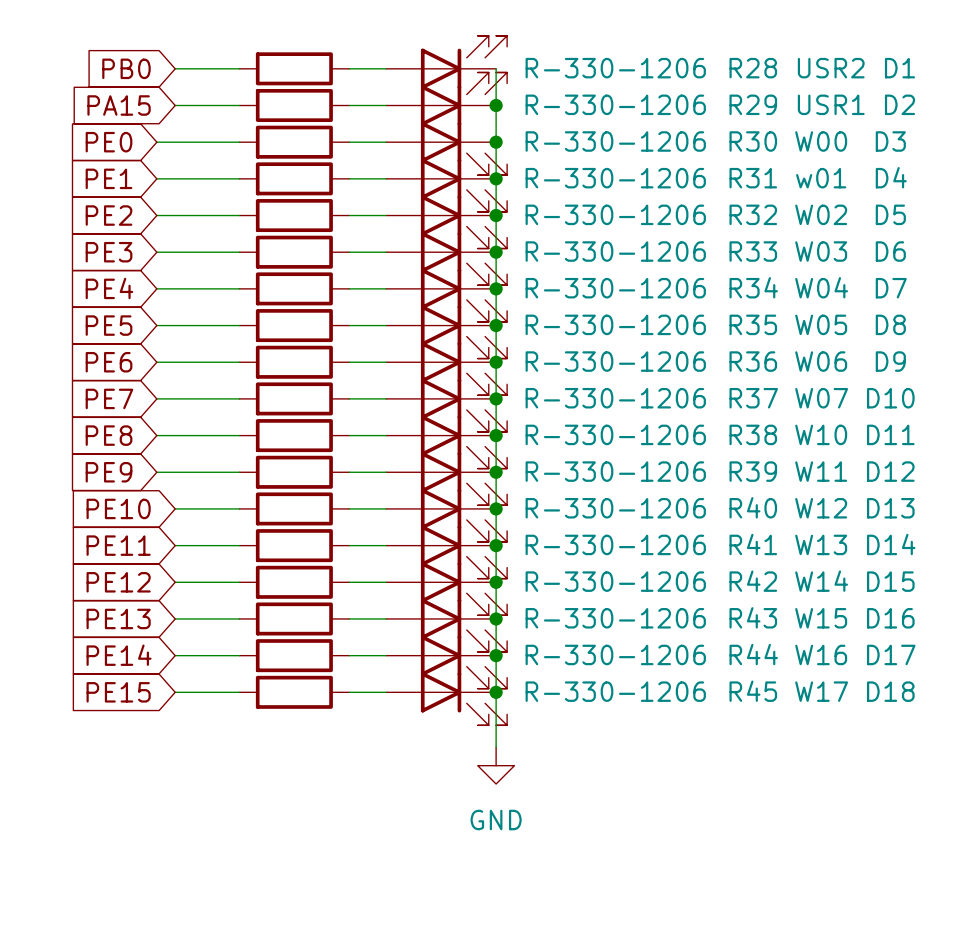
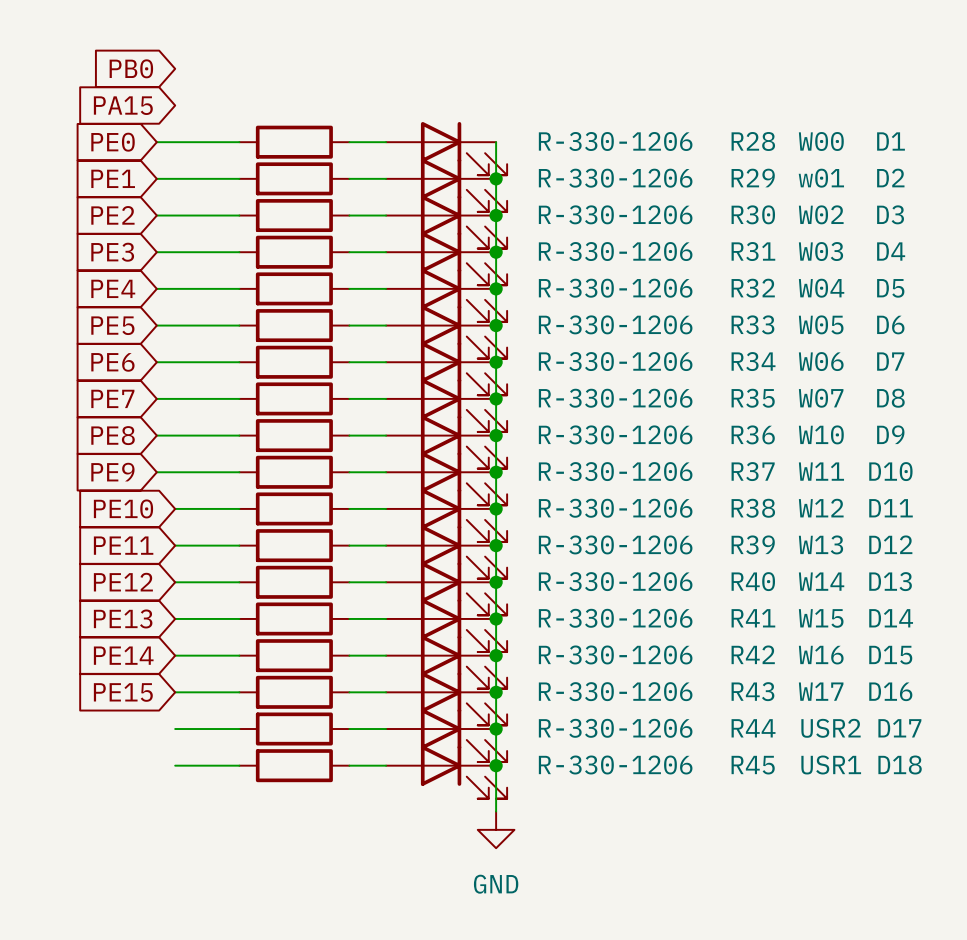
D1: USR2 (446, 62) -> none
wire: (175, 68) (239, 68) -> none
R28: R-330-1206 (294, 68) -> none
wire: (349, 68) (386, 68) -> none
wire: (496, 68) (496, 142) -> none
D2: USR1 (446, 99) -> none
wire: (175, 105) (239, 105) -> none
R29: R-330-1206 (294, 105) -> none
wire: (349, 105) (386, 105) -> none
junction: (496, 105) -> none
R30 name: R30 (753, 141) -> R28 (753, 141)
D3 name: D3 (890, 141) -> D1 (891, 141)
junction: (496, 142) -> none
D4 name: D4 (891, 177) -> D2 (890, 178)
R31 name: R31 (753, 178) -> R29 (753, 178)
R32 name: R32 (753, 214) -> R30 (753, 214)
D5 name: D5 (890, 214) -> D3 (890, 214)
R33 name: R33 (753, 251) -> R31 (753, 251)
D6 name: D6 (890, 251) -> D4 (891, 251)
R34 name: R34 (753, 287) -> R32 (753, 288)
D7 name: D7 (891, 288) -> D5 (890, 288)
R35 name: R35 (753, 324) -> R33 (752, 324)
D8 name: D8 (890, 324) -> D6 (890, 325)
R36 name: R36 (753, 361) -> R34 (753, 361)
D9 name: D9 (890, 361) -> D7 (890, 361)
R37 name: R37 (753, 398) -> R35 (753, 398)
D10 name: D10 (890, 398) -> D8 (890, 398)
R38 name: R38 (753, 434) -> R36 (753, 434)
D11 name: D11 (890, 434) -> D9 (890, 434)
R39 name: R39 (753, 471) -> R37 (753, 471)
D12 name: D12 (890, 471) -> D10 (890, 471)
R40 name: R40 (753, 507) -> R38 (753, 508)
D13 name: D13 (890, 508) -> D11 (891, 508)
R41 name: R41 (753, 544) -> R39 (753, 544)
D14 name: D14 (891, 544) -> D12 (890, 544)
R42 name: R42 (753, 581) -> R40 (753, 581)
D15 name: D15 (890, 581) -> D13 (890, 581)
R43 name: R43 (753, 617) -> R41 (753, 618)
D16 name: D16 (890, 618) -> D14 (891, 618)
R44 name: R44 (753, 654) -> R42 (753, 654)
D17 name: D17 (891, 654) -> D15 (890, 655)
R45 name: R45 (753, 691) -> R43 (752, 691)
D18 name: D18 (890, 691) -> D16 (890, 691)
wire: none -> (175, 729) (239, 729)
R44: none -> R-330-1206 (294, 729)
wire: none -> (349, 729) (386, 729)
junction: none -> (496, 729)
D17: none -> USR2 (446, 735)
wire: none -> (496, 747) (496, 811)
wire: none -> (175, 765) (239, 765)
R45: none -> R-330-1206 (294, 765)
wire: none -> (349, 765) (386, 765)
junction: none -> (496, 765)
power symbol position: GND (496, 765) -> GND (496, 829)
D18: none -> USR1 (446, 772)

